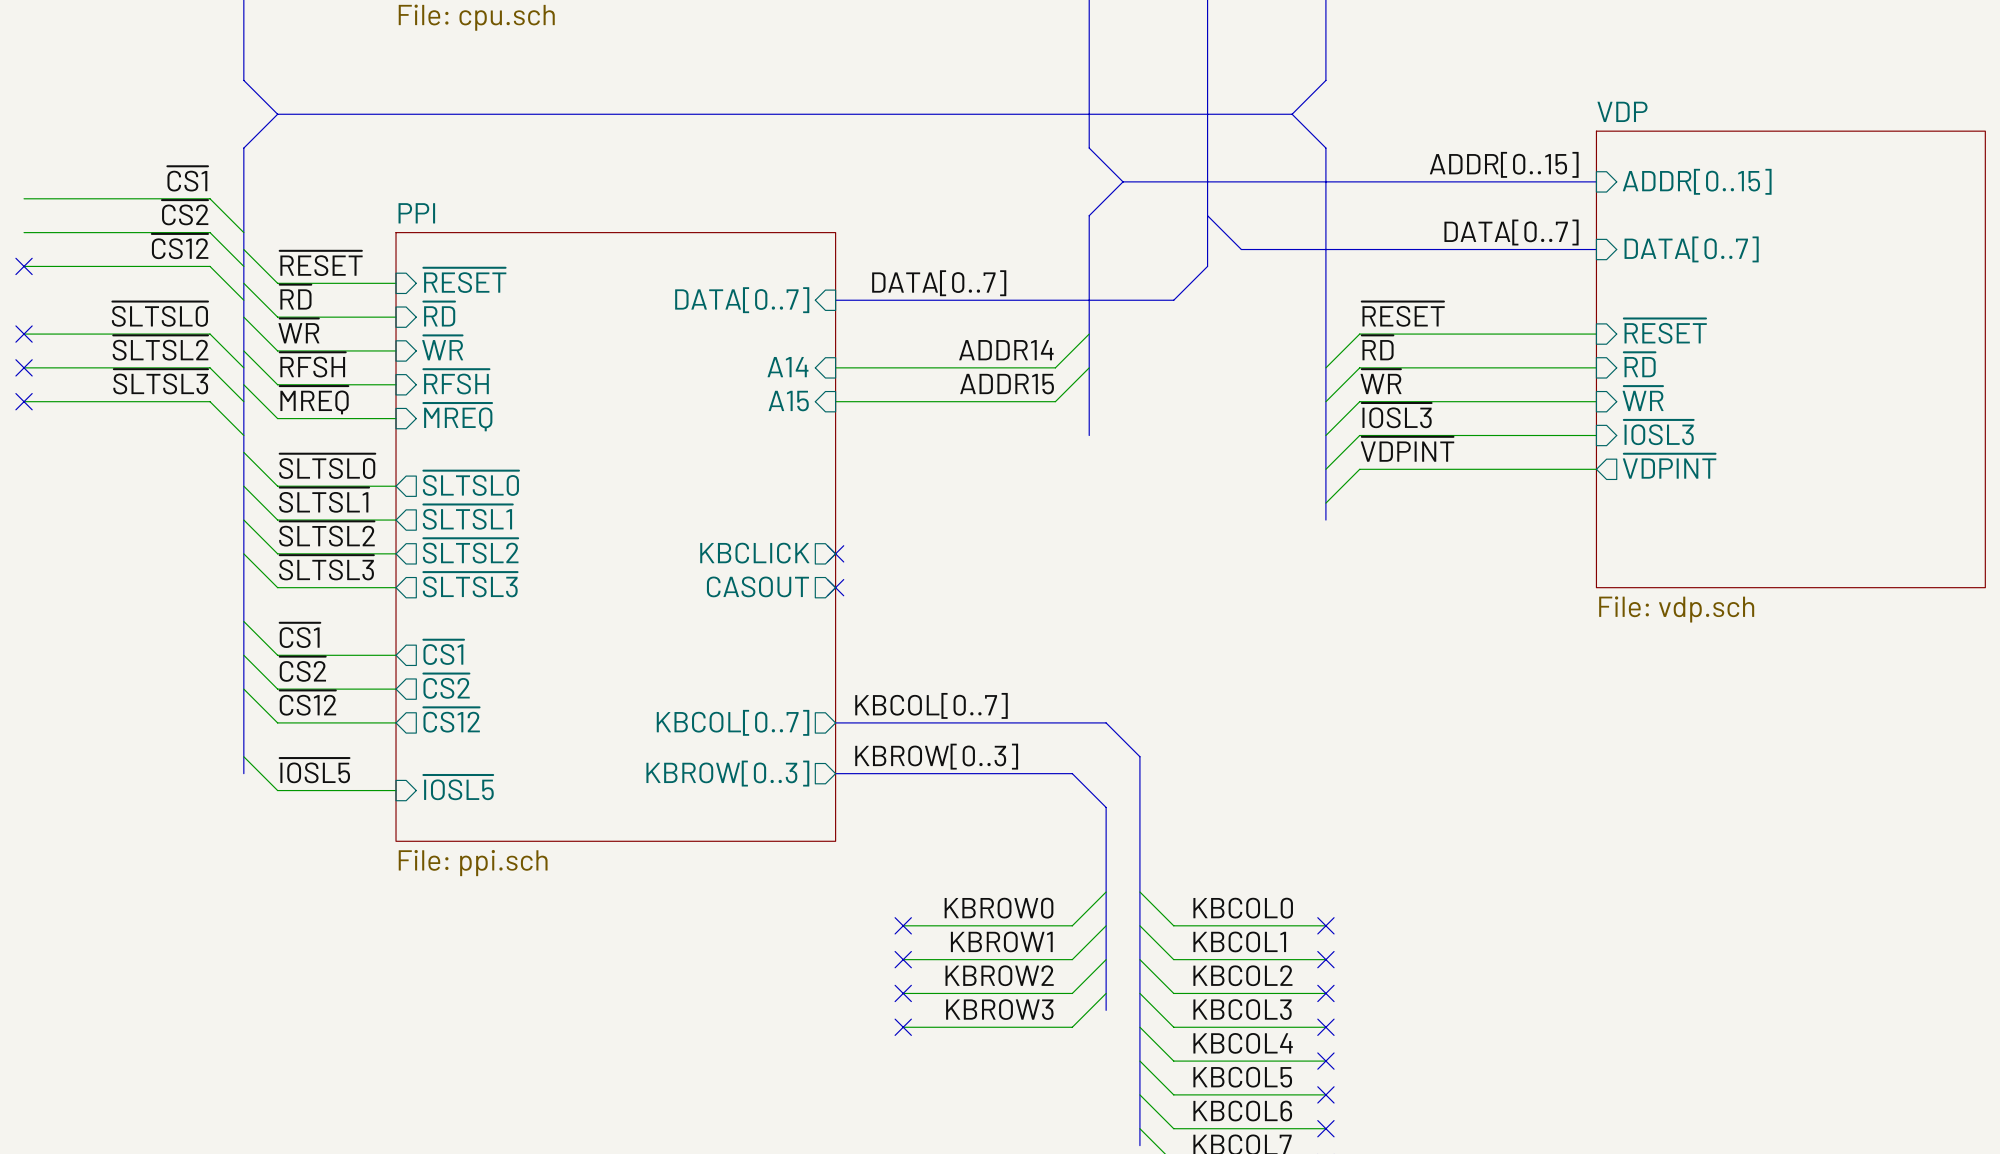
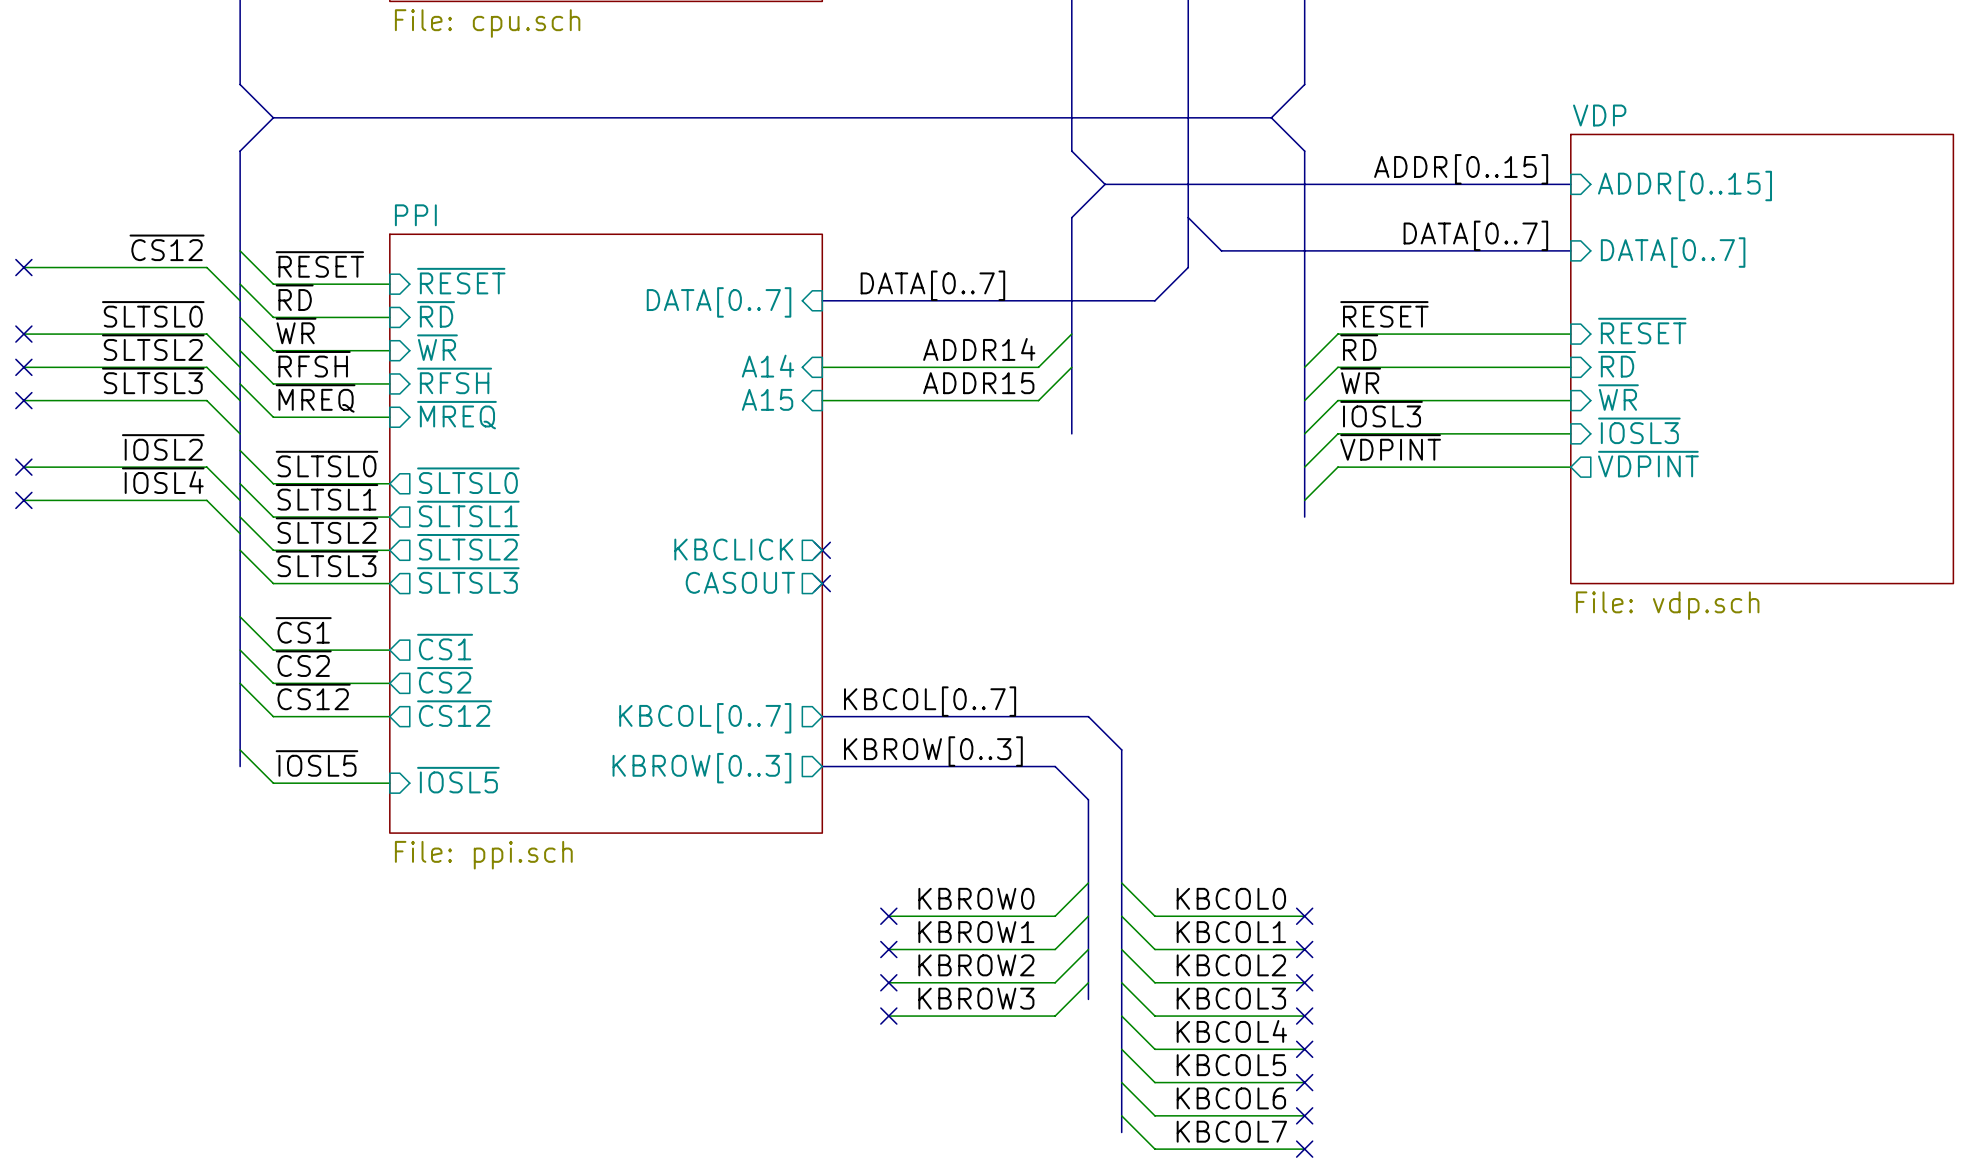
label: ~{CS1} (187, 178) -> none
wire: (24, 198) (210, 198) (243, 232) -> (23, 467) (206, 467) (240, 500)
label: ~{CS2} (185, 212) -> none
wire: (24, 232) (210, 232) (243, 266) -> (23, 500) (206, 500) (240, 533)
label: none -> ~{IOSL2} (163, 447)
no-connect mark: none -> (23, 467)
label: none -> ~{IOSL4} (163, 480)
no-connect mark: none -> (23, 500)

